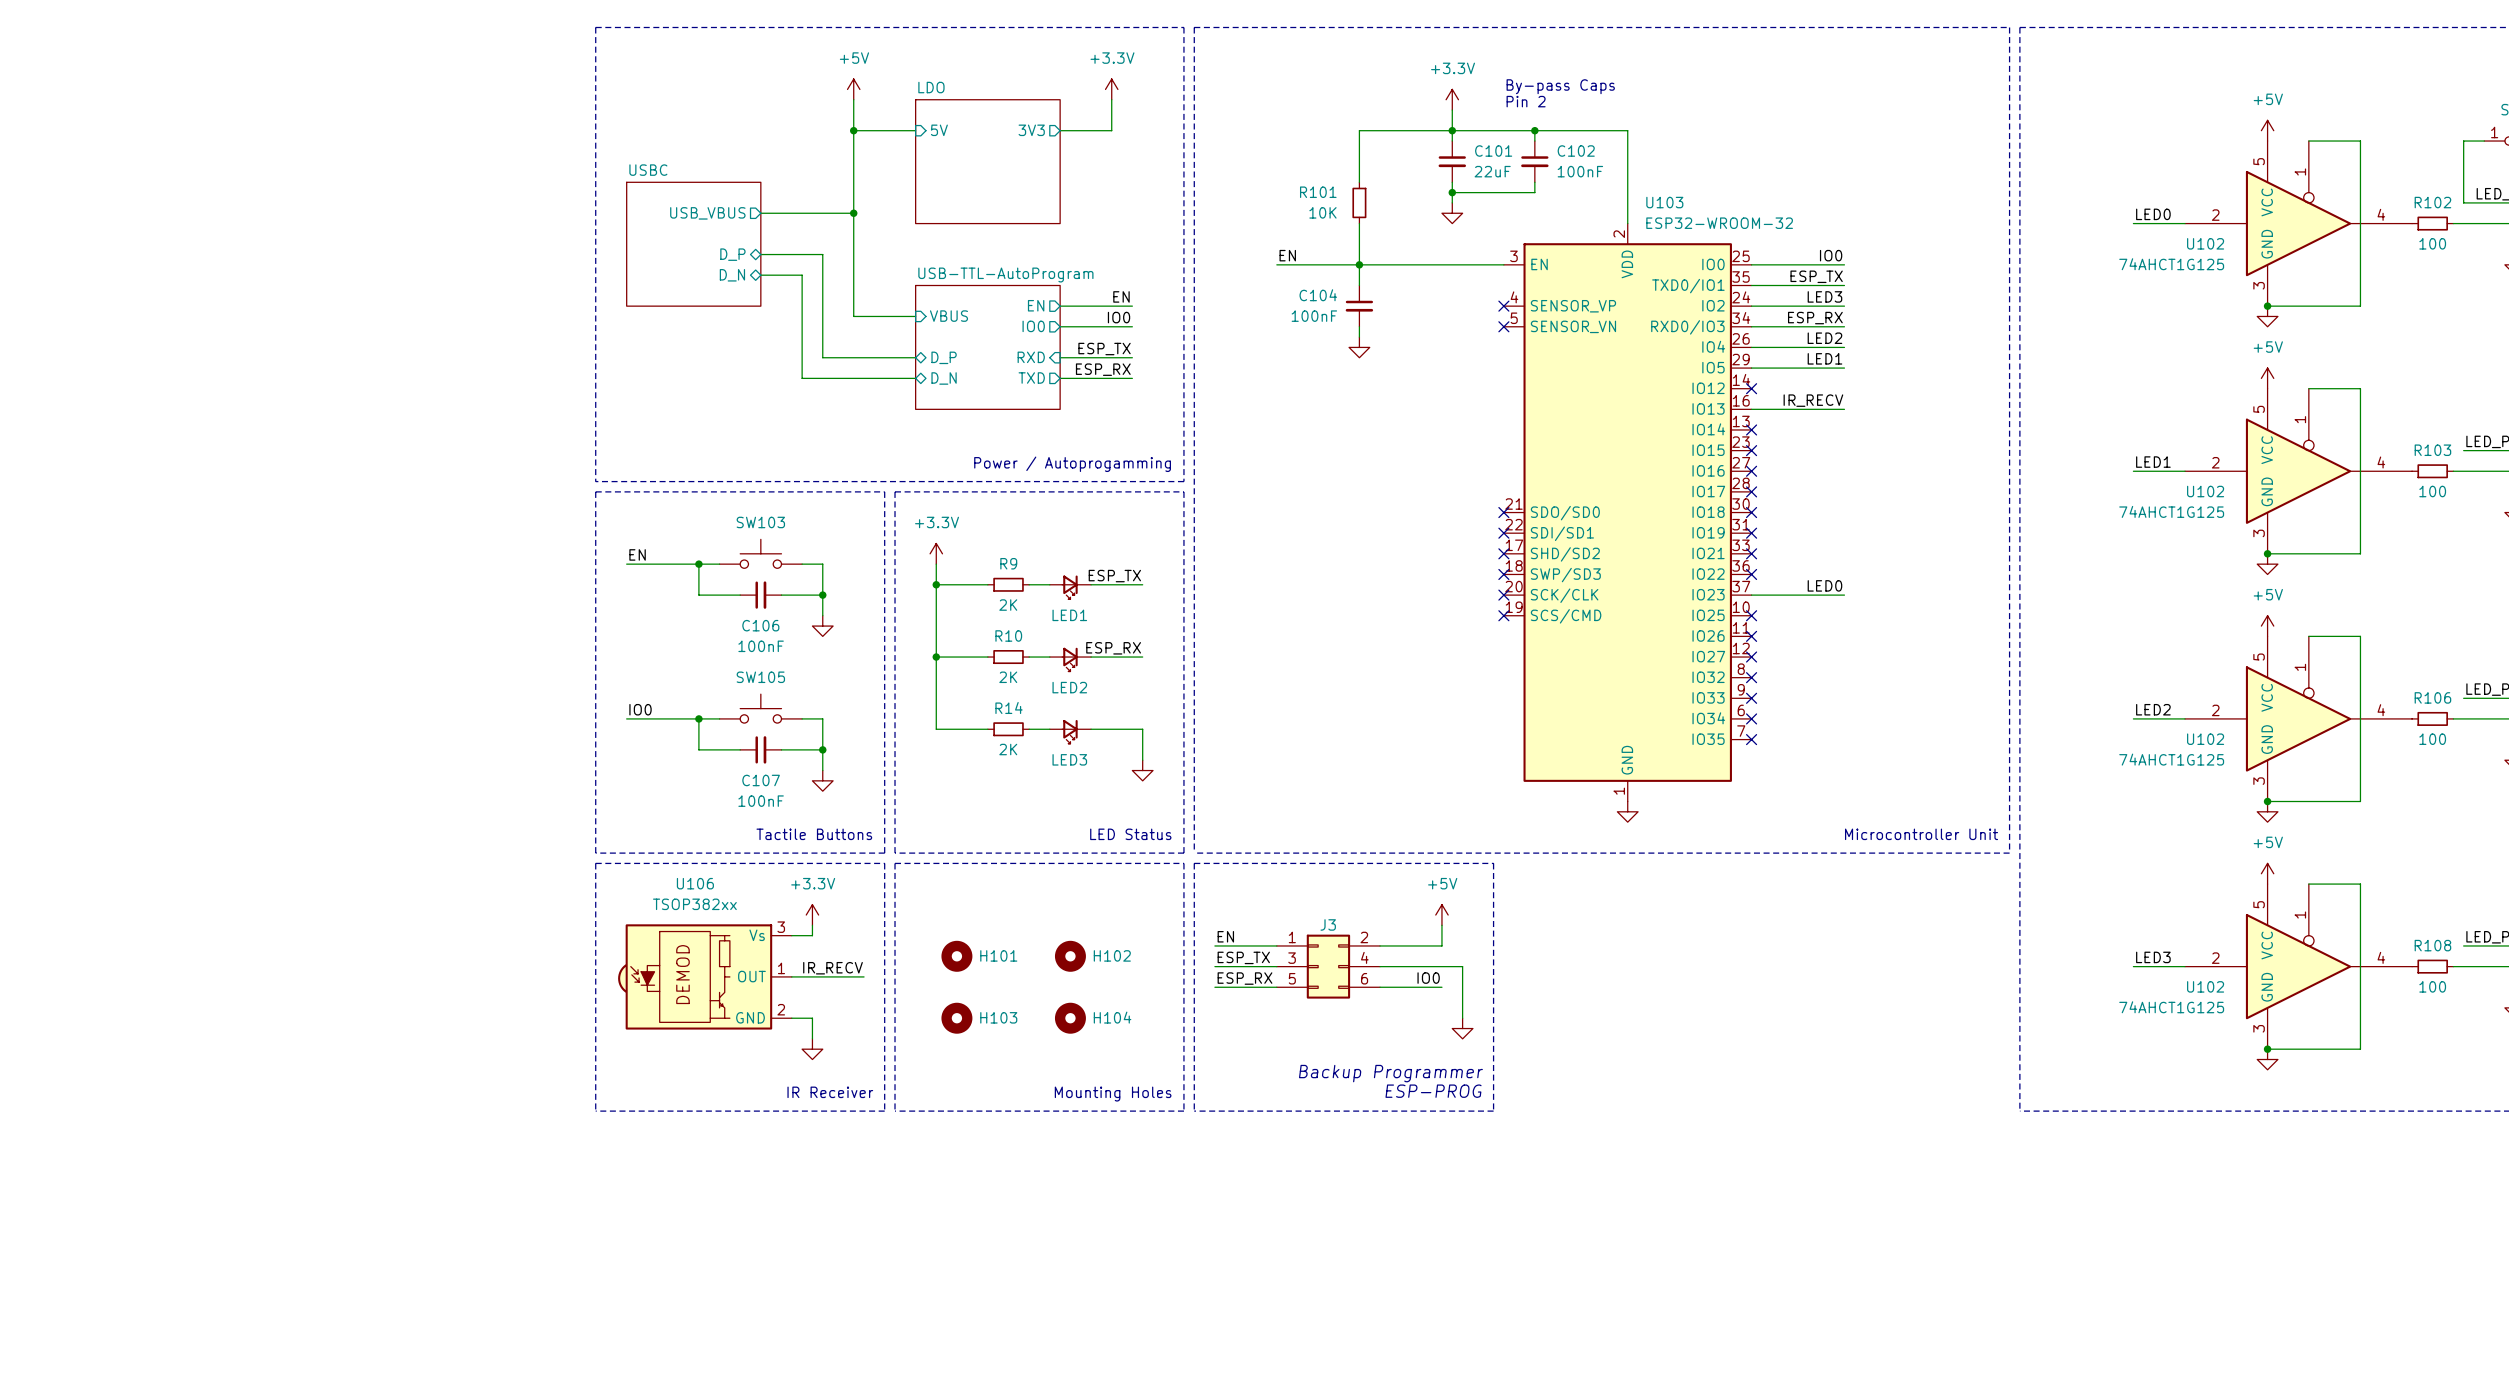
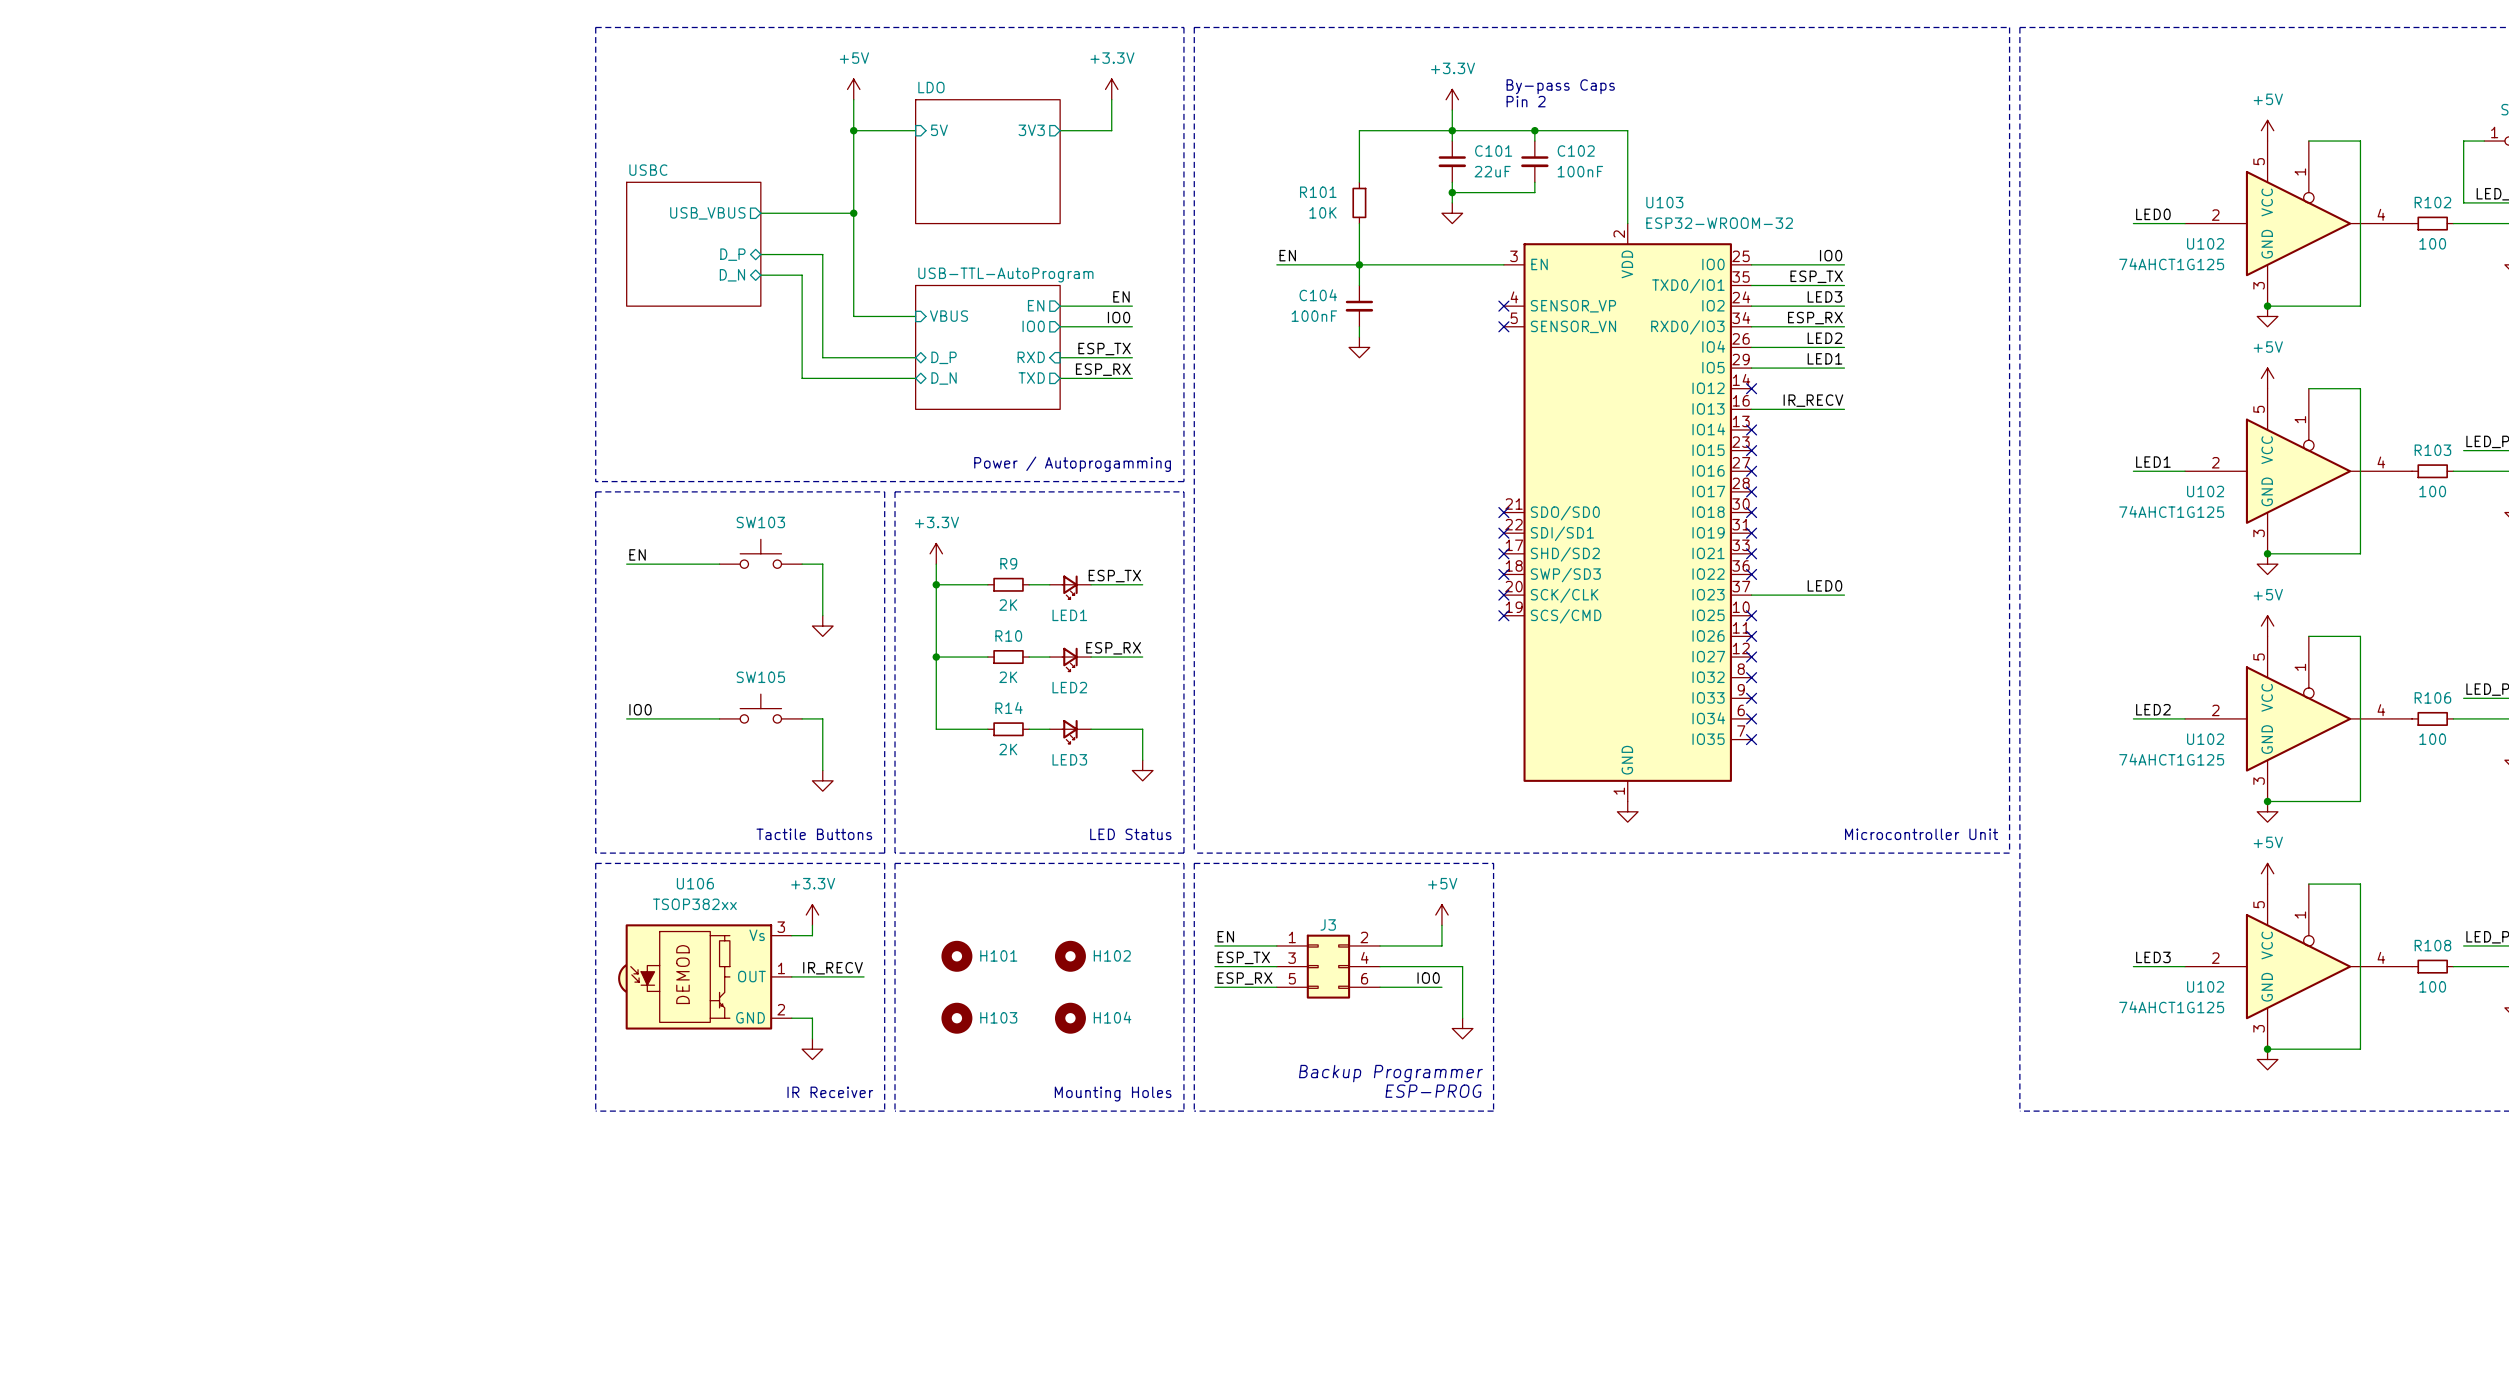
wire: (698, 564) (698, 595) (740, 595) -> none
junction: (698, 564) -> none
C106: 100nF (760, 595) -> none
wire: (781, 595) (822, 595) -> none
junction: (822, 595) -> none
wire: (698, 718) (698, 749) (740, 749) -> none
junction: (698, 718) -> none
C107: 100nF (760, 749) -> none
wire: (781, 749) (822, 749) -> none
junction: (822, 749) -> none

